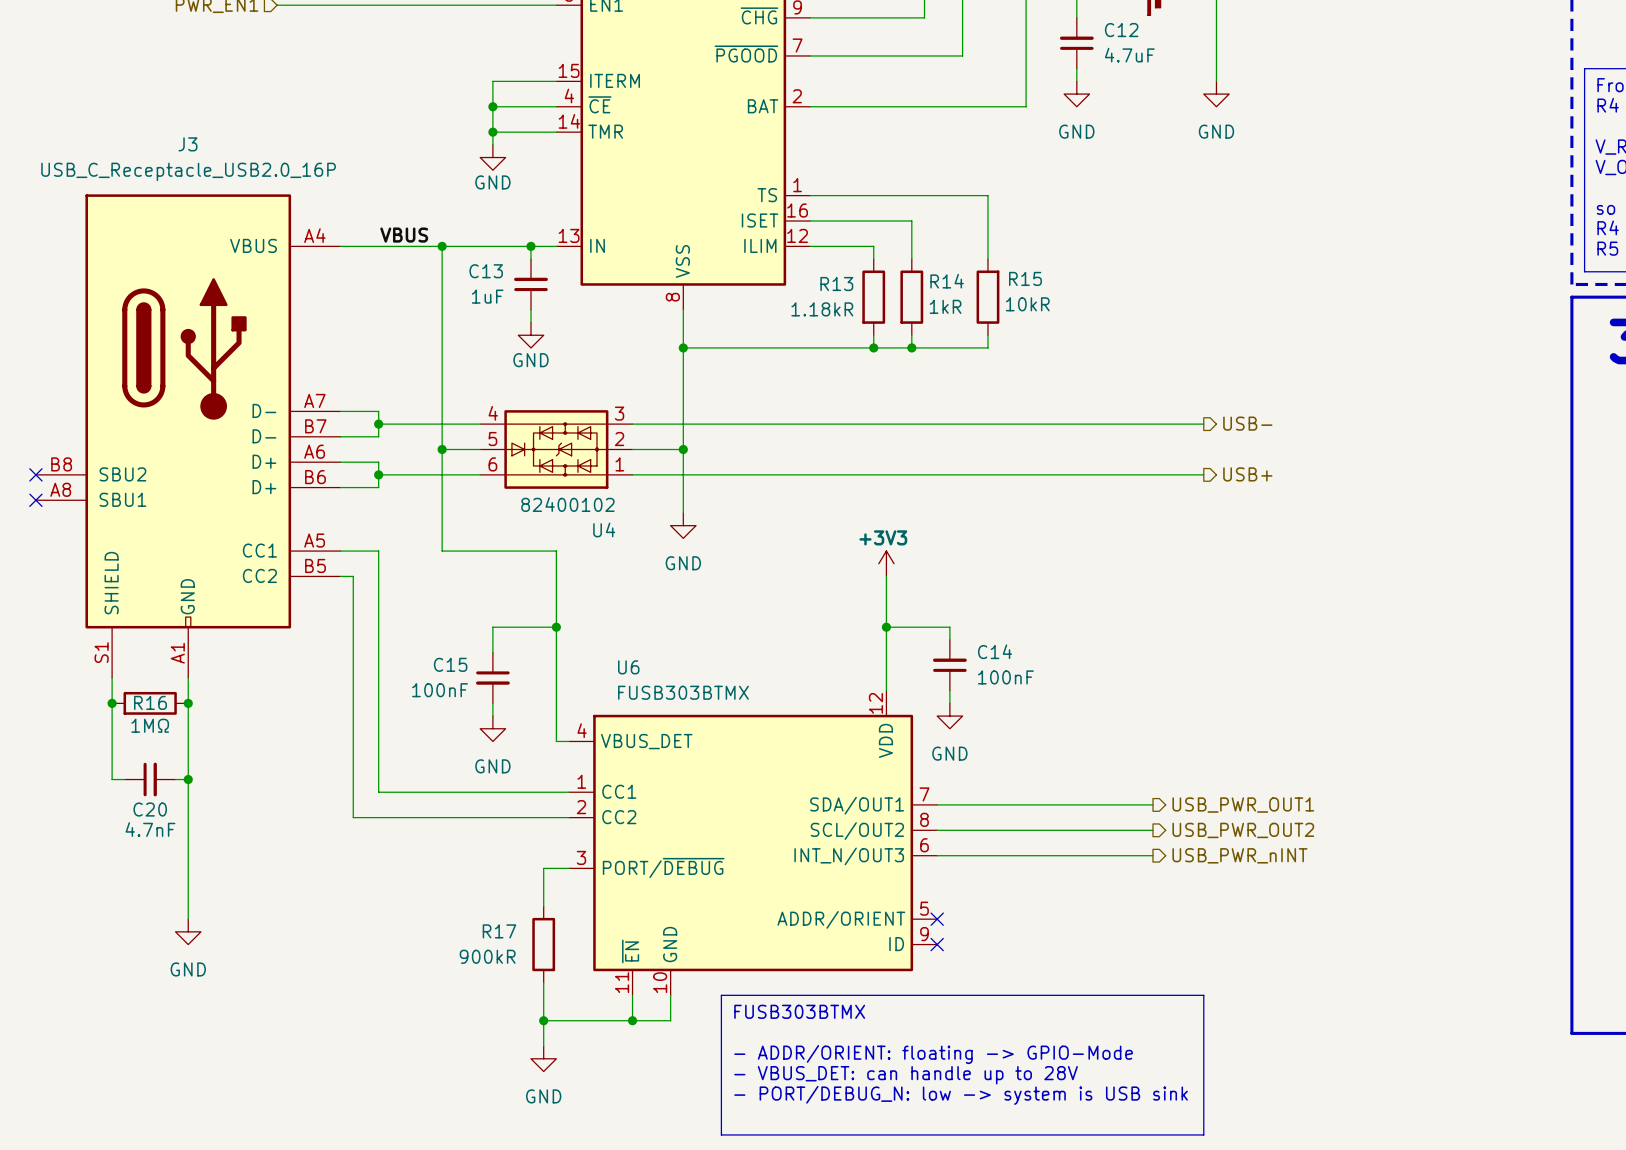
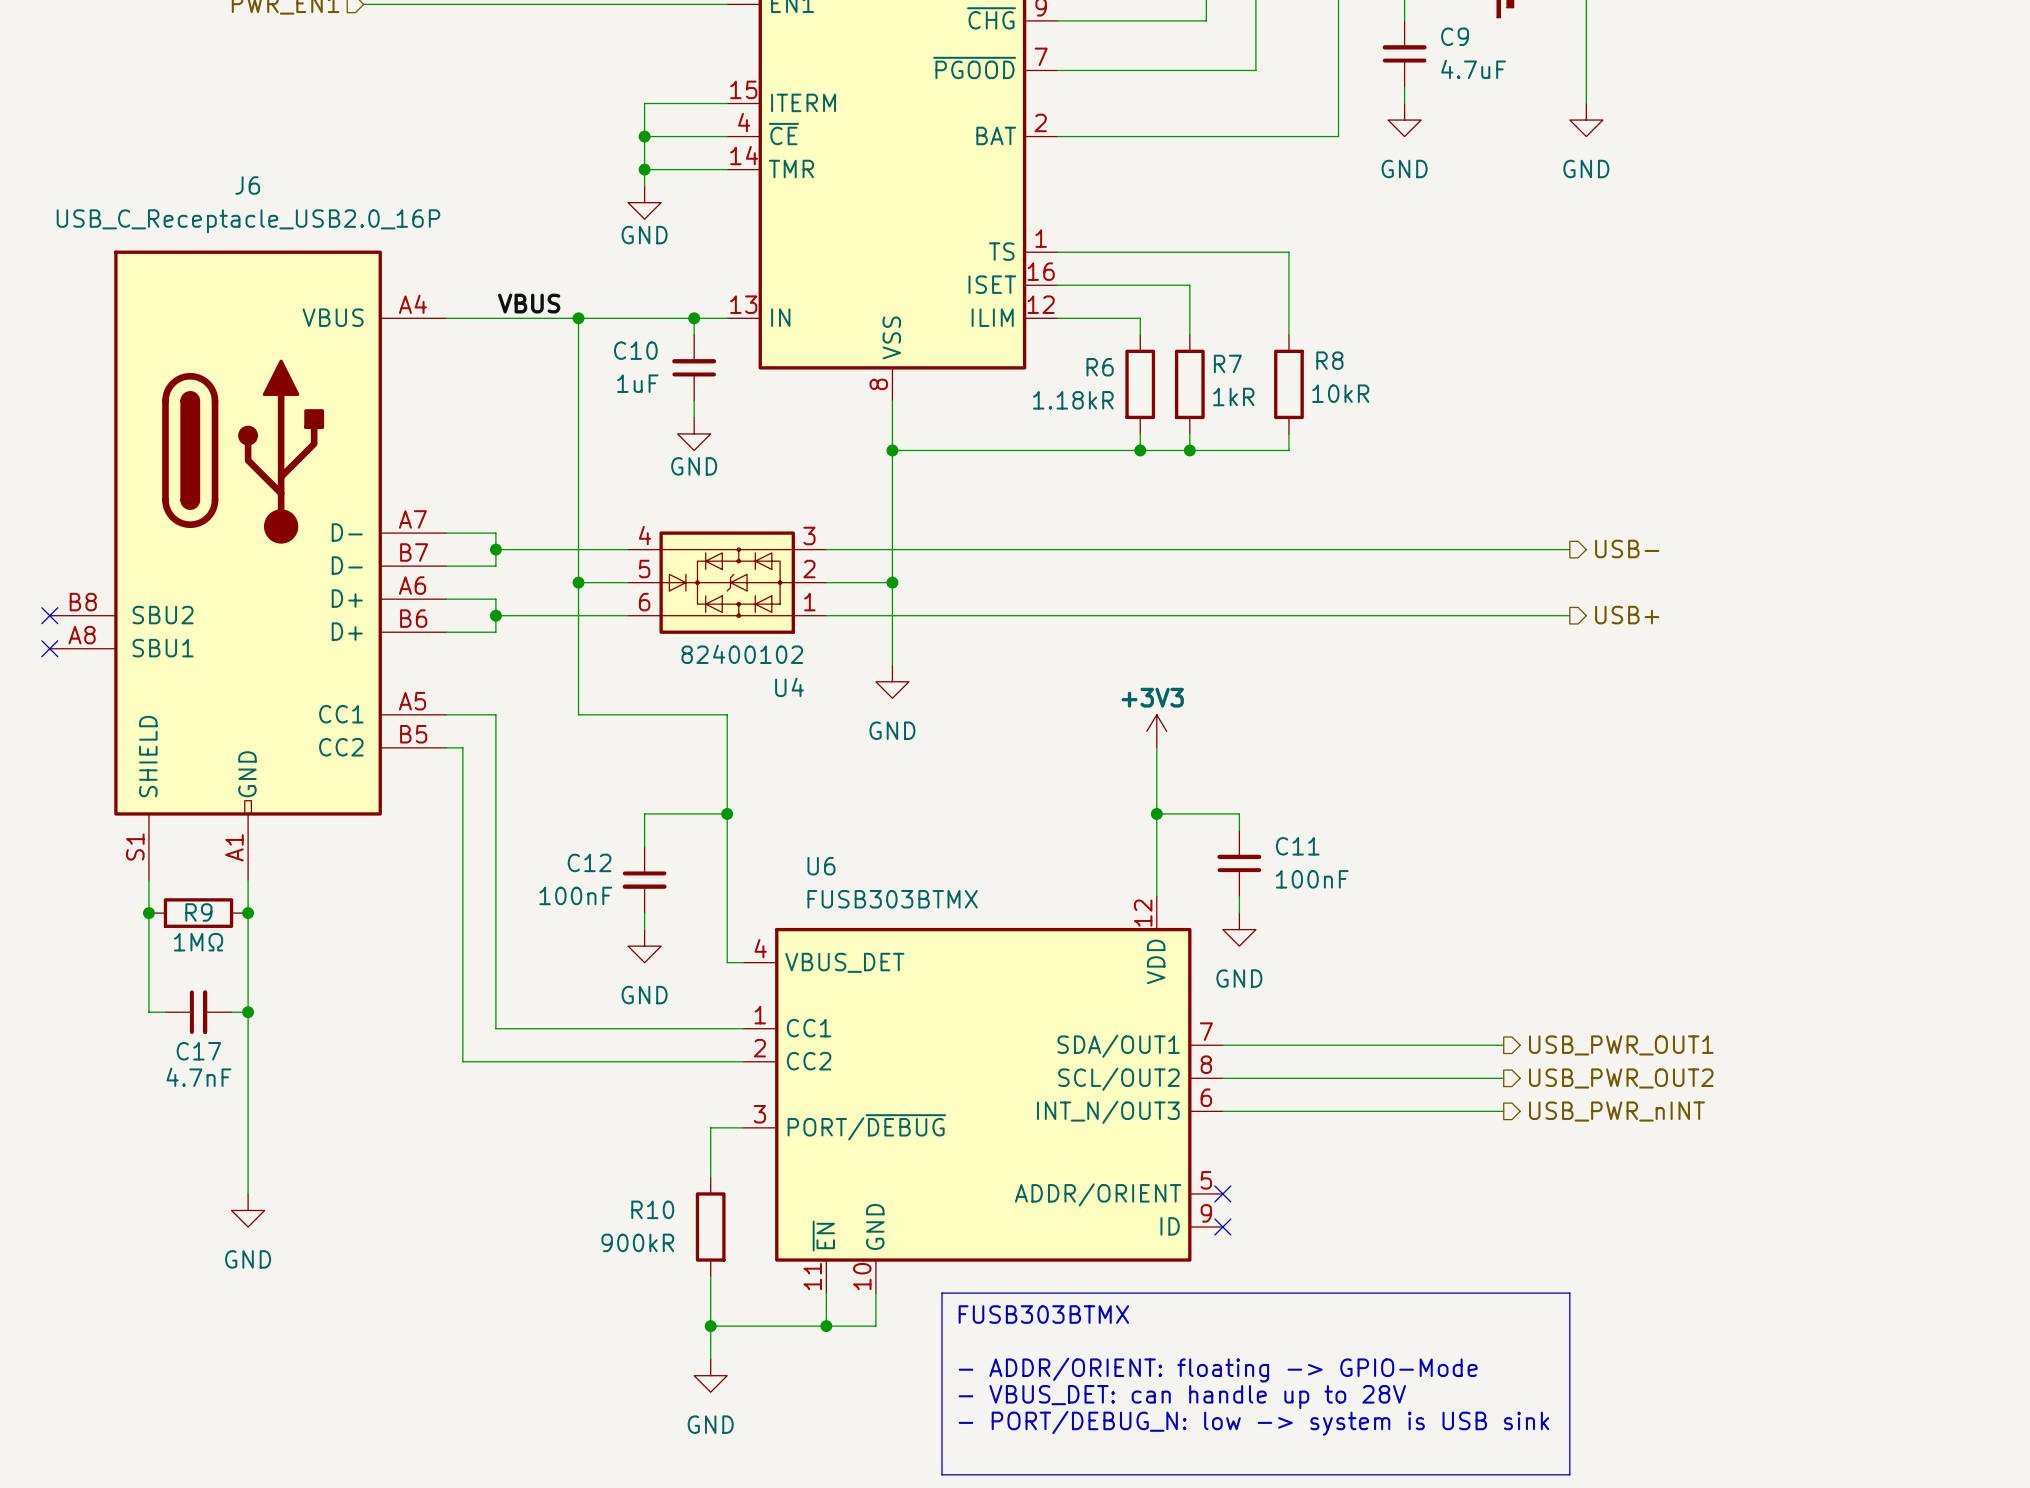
C12 name: C12 (1121, 30) -> C9 (1455, 36)
J3 name: J3 (187, 144) -> J6 (247, 185)
C13 name: C13 (486, 271) -> C10 (635, 350)
R15 name: R15 (1025, 278) -> R8 (1329, 360)
R14 name: R14 (947, 281) -> R7 (1227, 363)
R13 name: R13 (836, 284) -> R6 (1100, 367)
C14 name: C14 (995, 651) -> C11 (1297, 846)
C15 name: C15 (450, 664) -> C12 (589, 862)
R16 name: R16 (150, 702) -> R9 (198, 912)
C20 name: C20 (150, 809) -> C17 (198, 1051)
R17 name: R17 (499, 931) -> R10 (652, 1209)

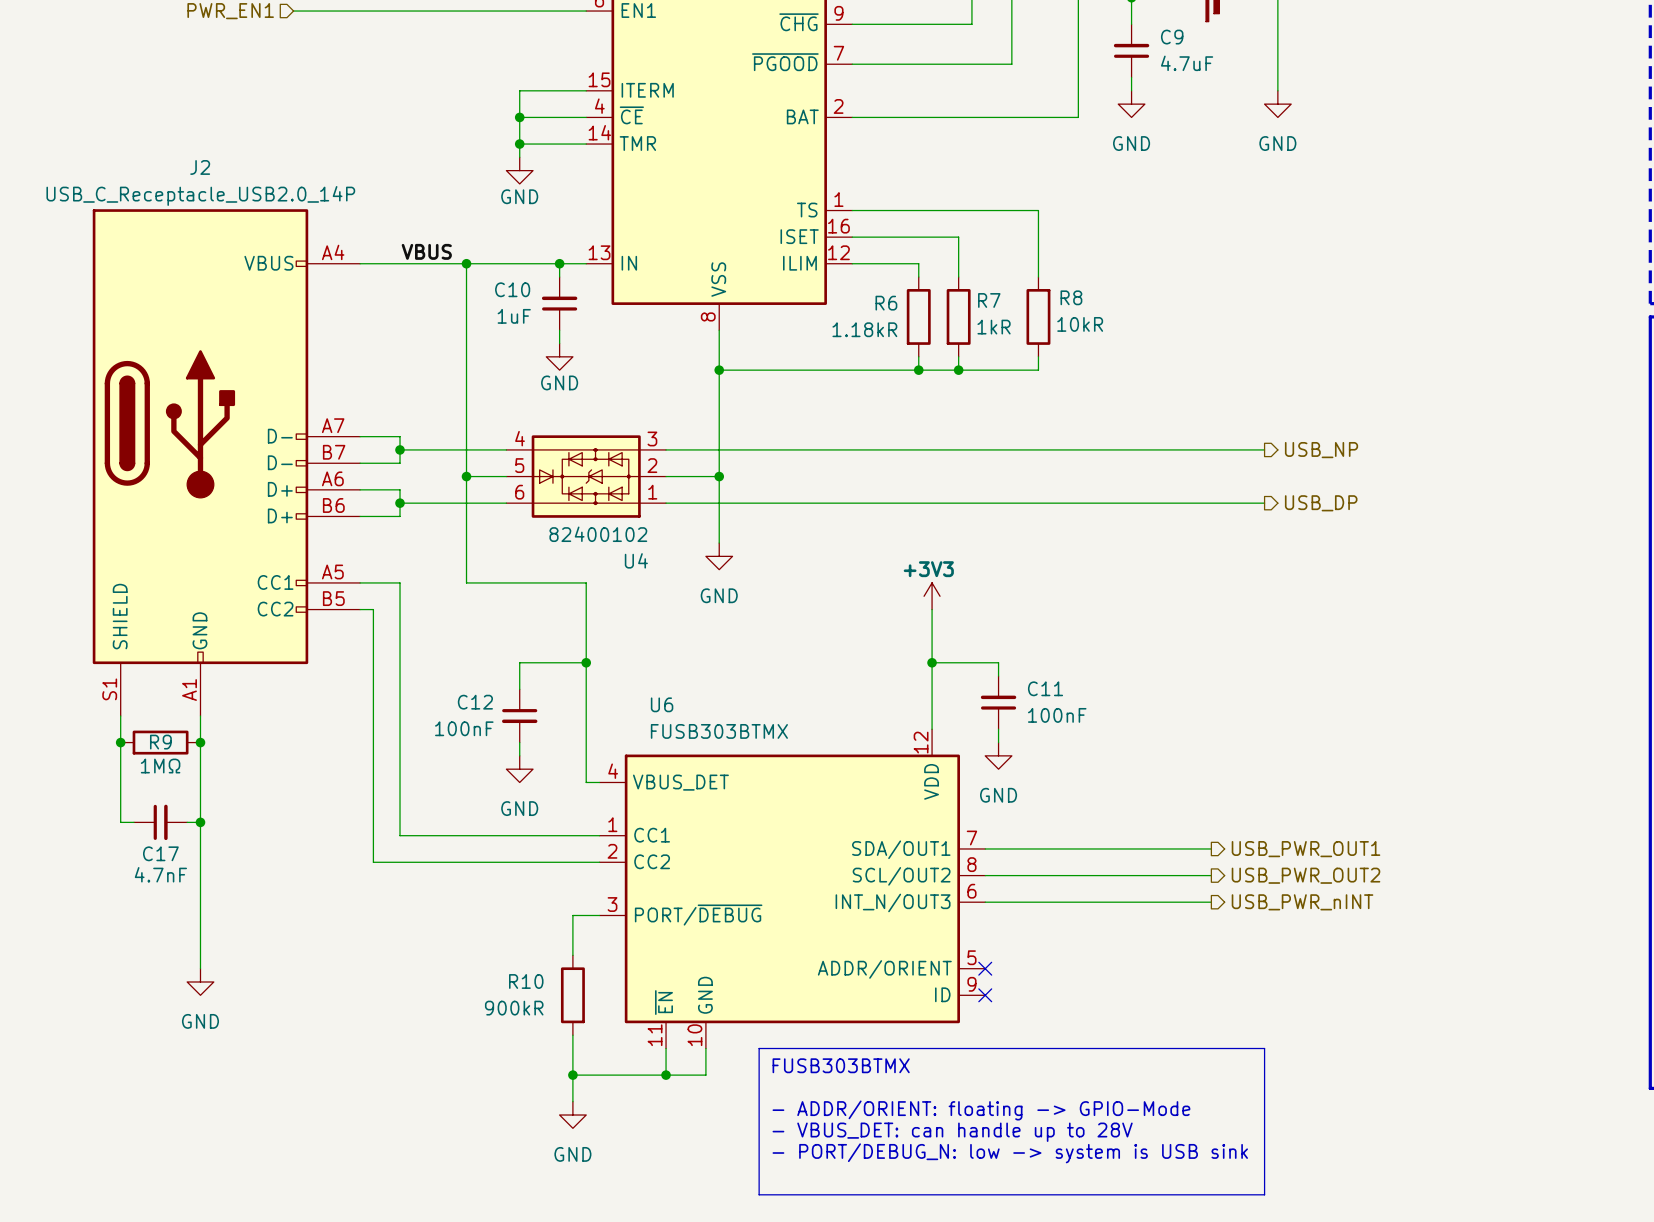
hierarchical label: USB- (1627, 548) -> USB_NP (1321, 450)
J6: USB_C_Receptacle_USB2.0_16P (248, 565) -> none
J2: none -> USB_C_Receptacle_USB2.0_14P (226, 462)
no-connect mark: (49, 615) -> none
hierarchical label: USB+ (1627, 615) -> USB_DP (1321, 503)
no-connect mark: (49, 648) -> none

